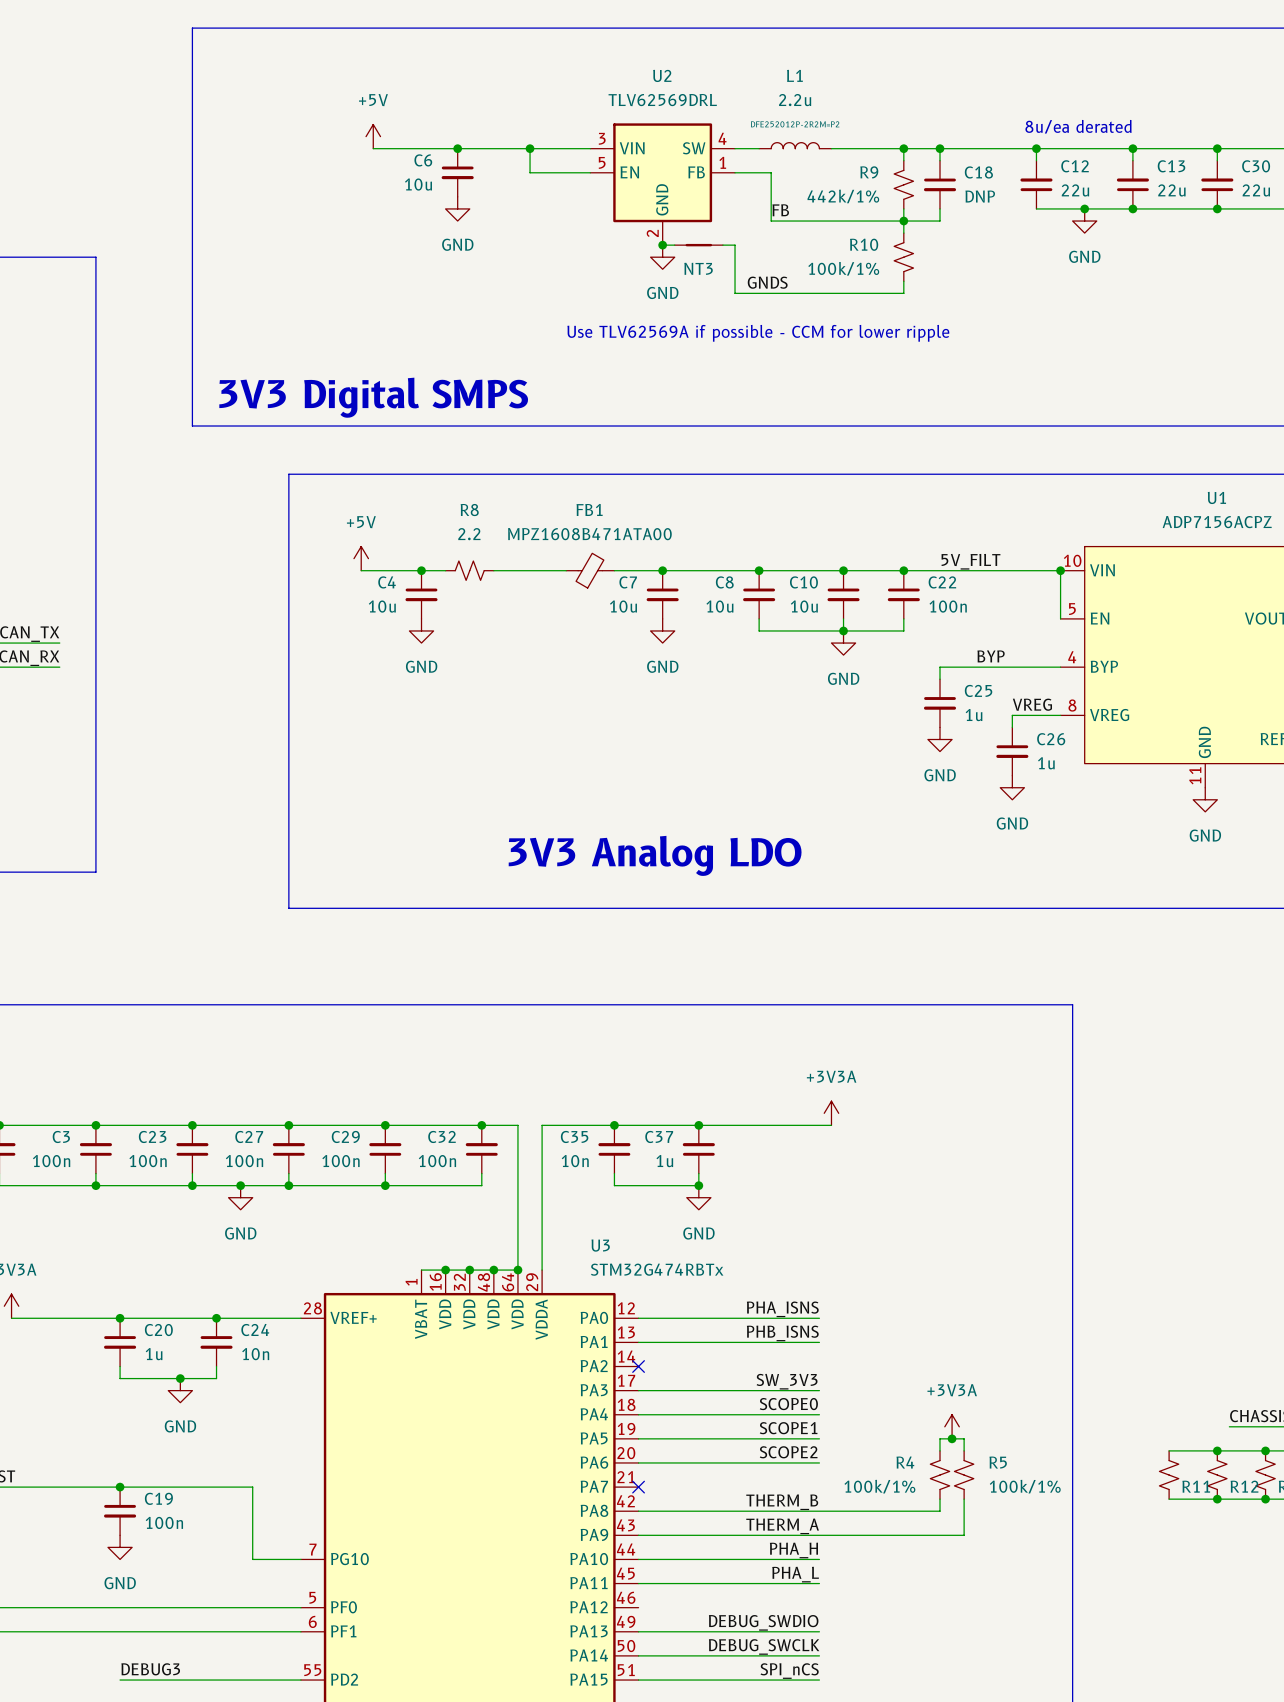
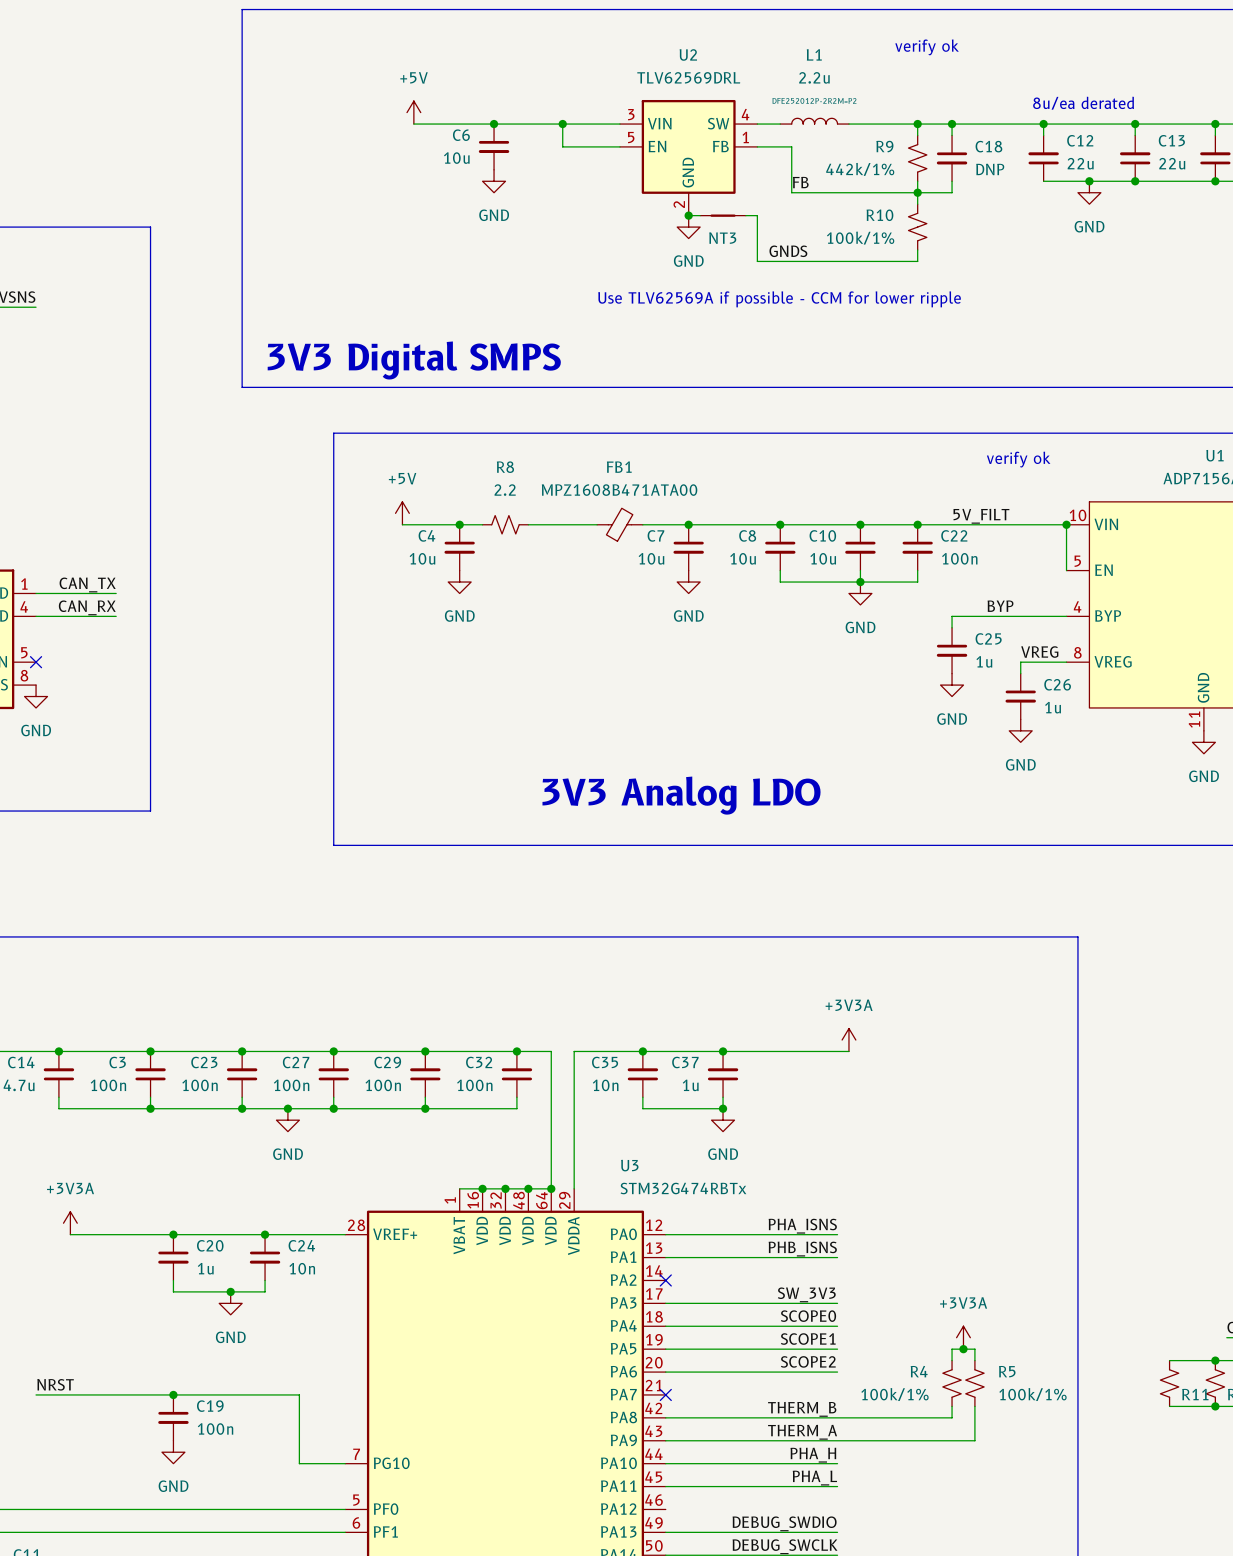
text: none -> verify ok (927, 47)
text: none -> verify ok (1018, 459)

